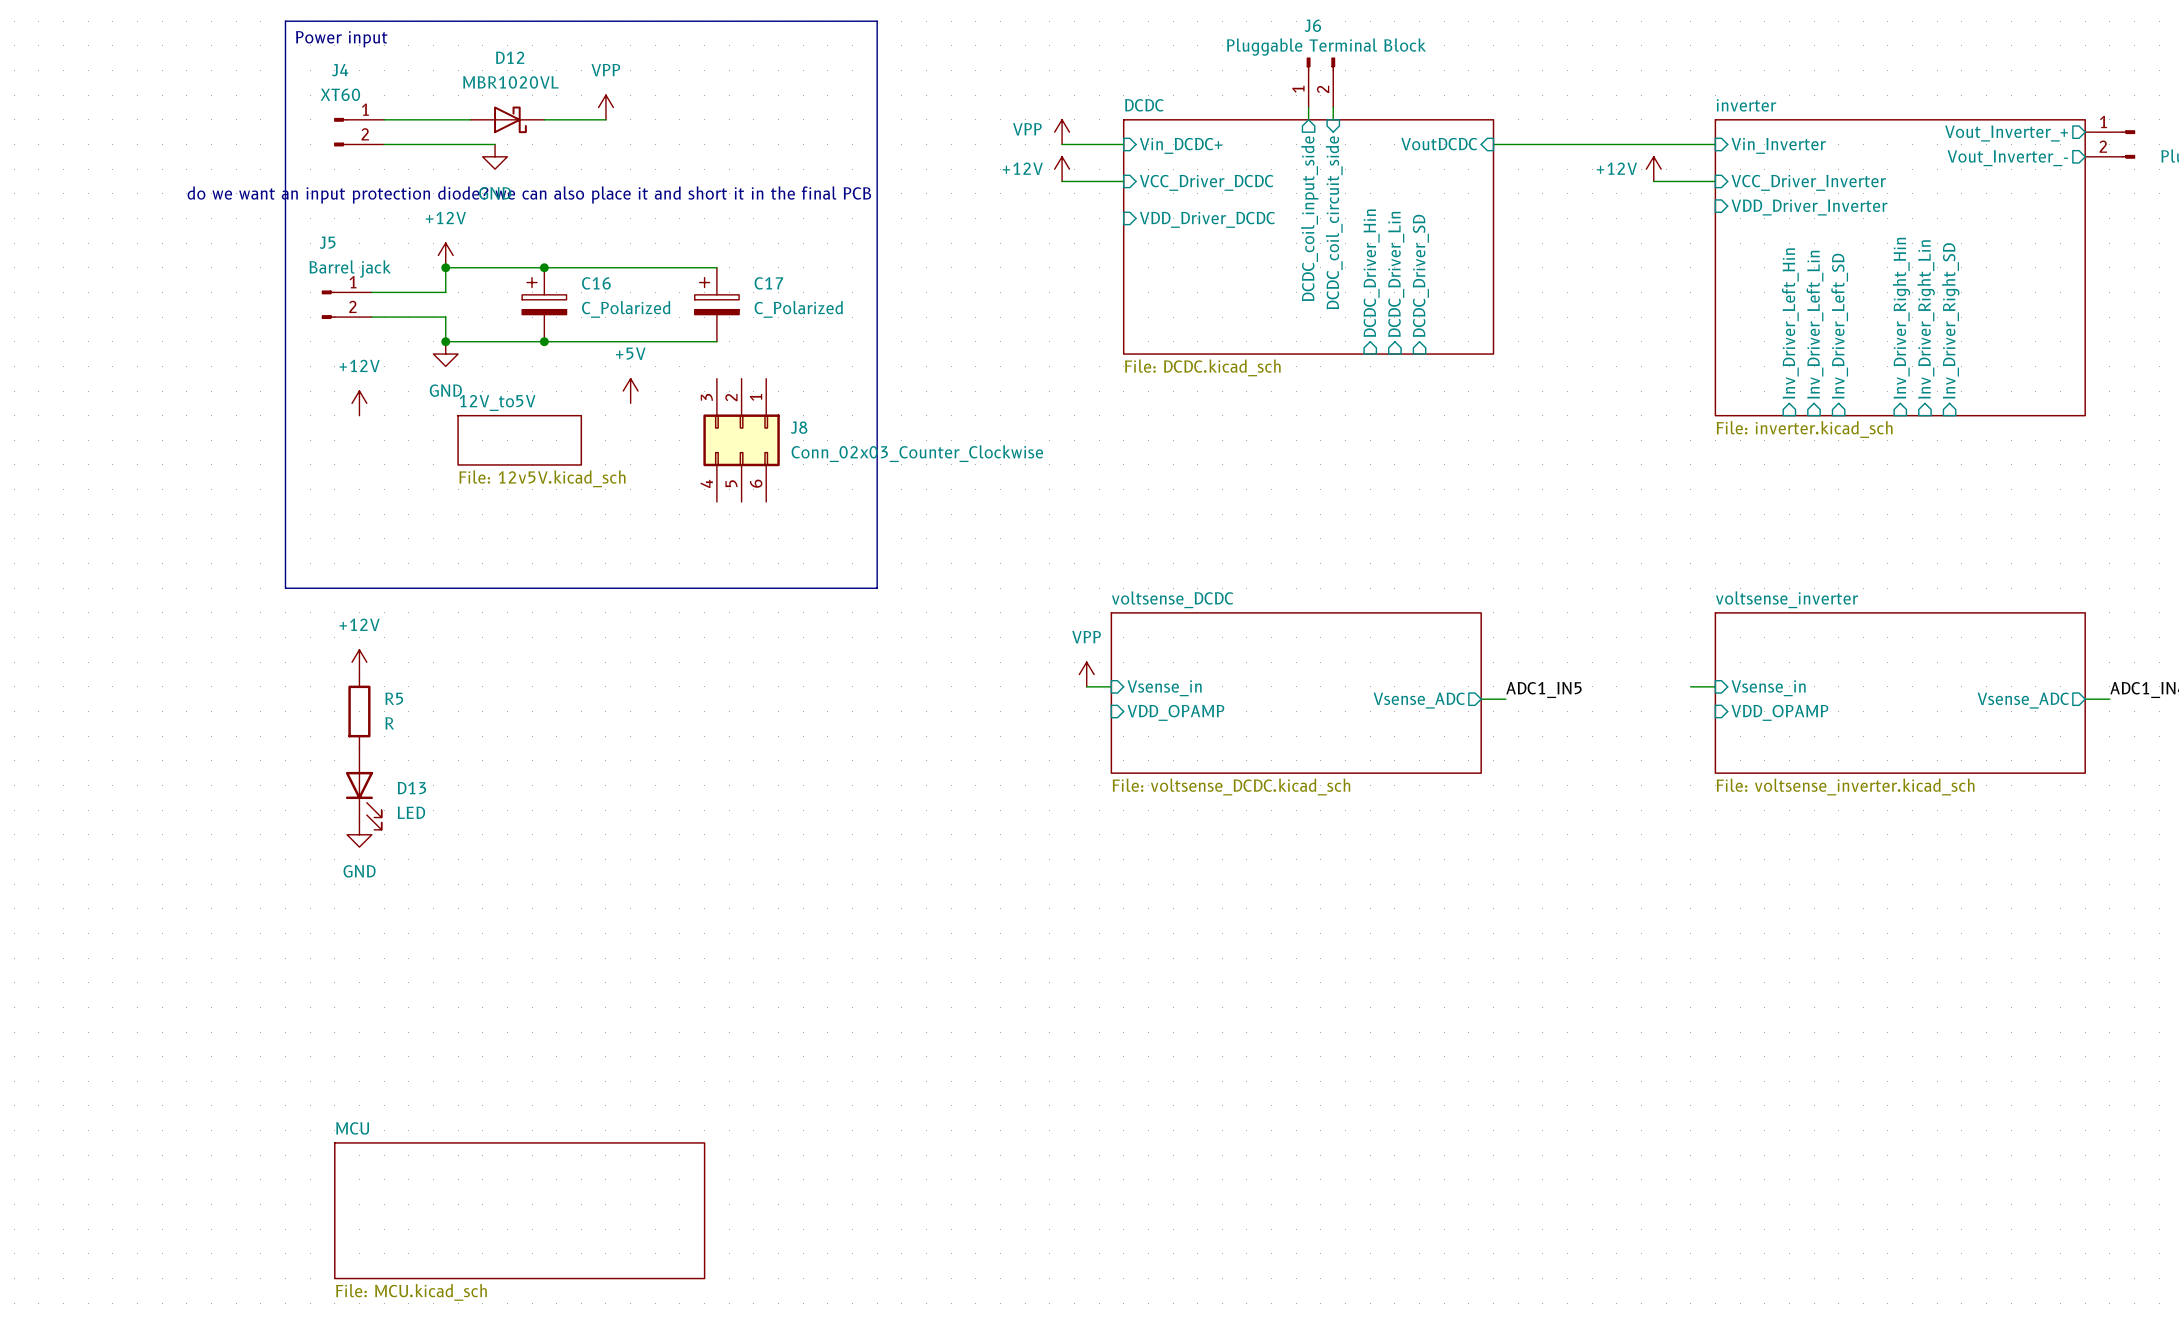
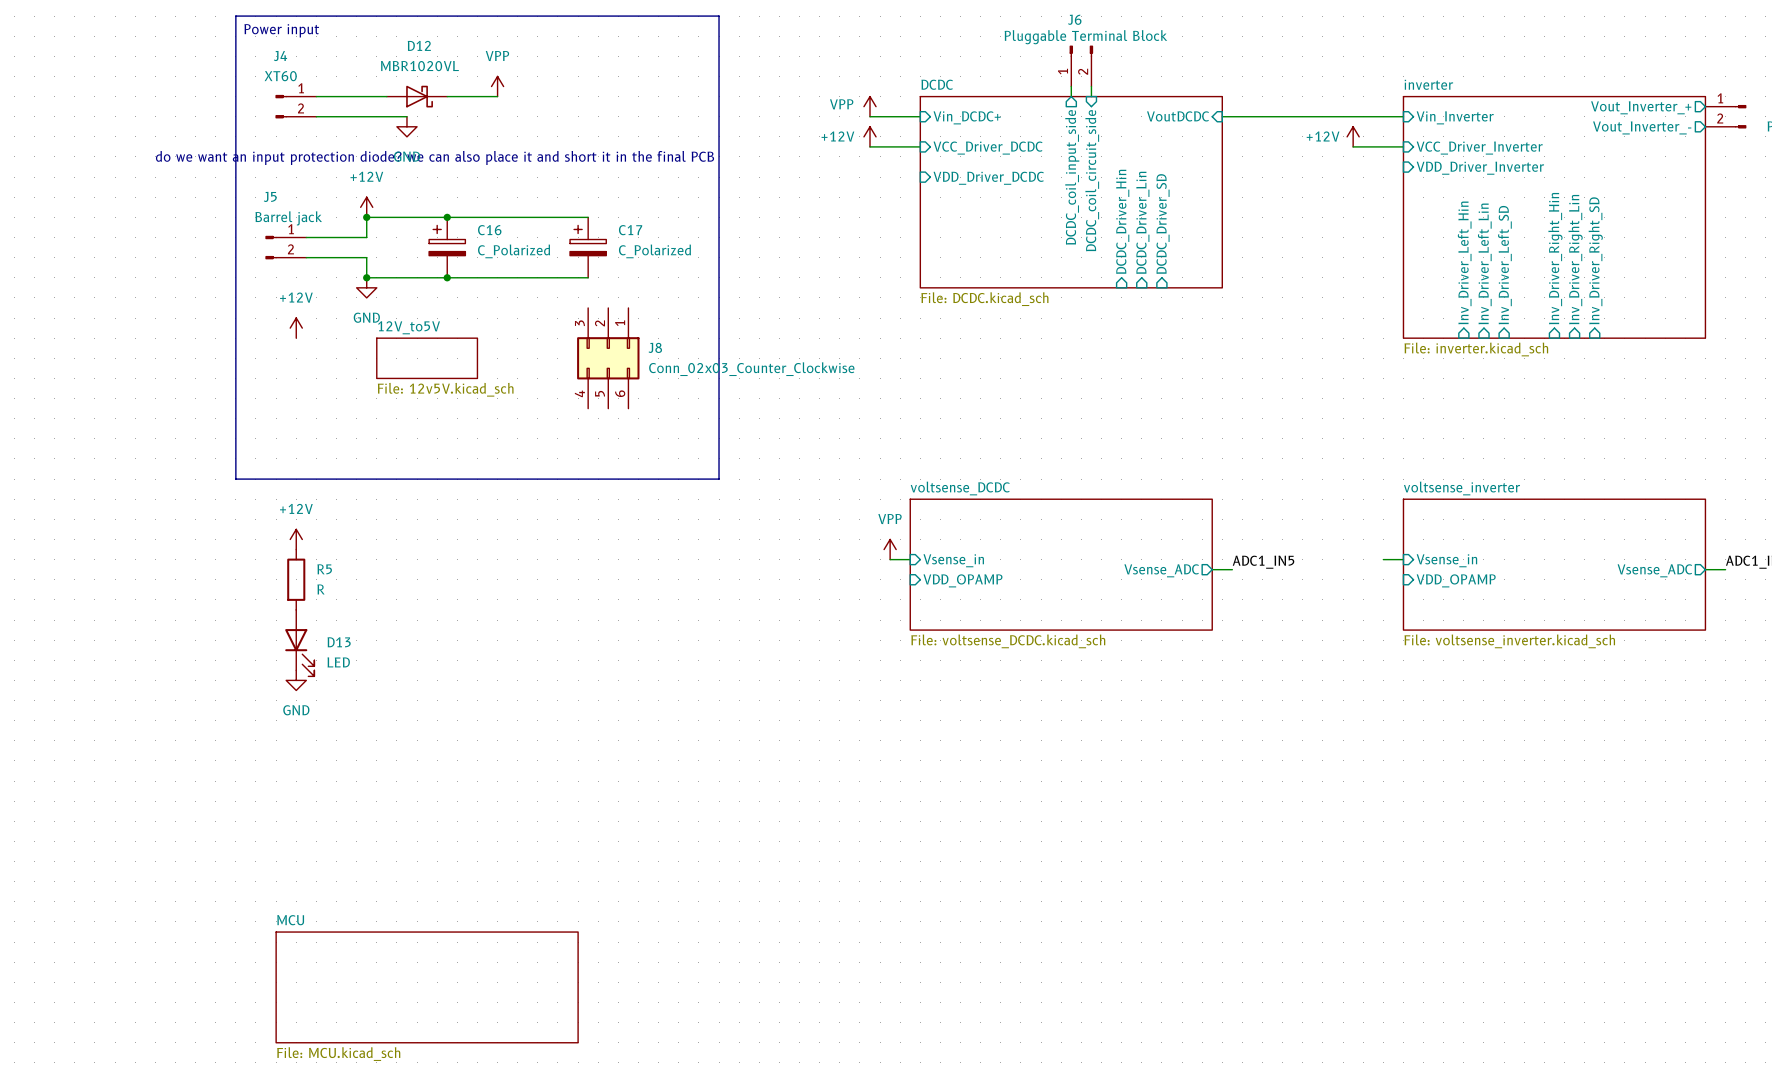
power symbol: +5V (630, 391) -> none

